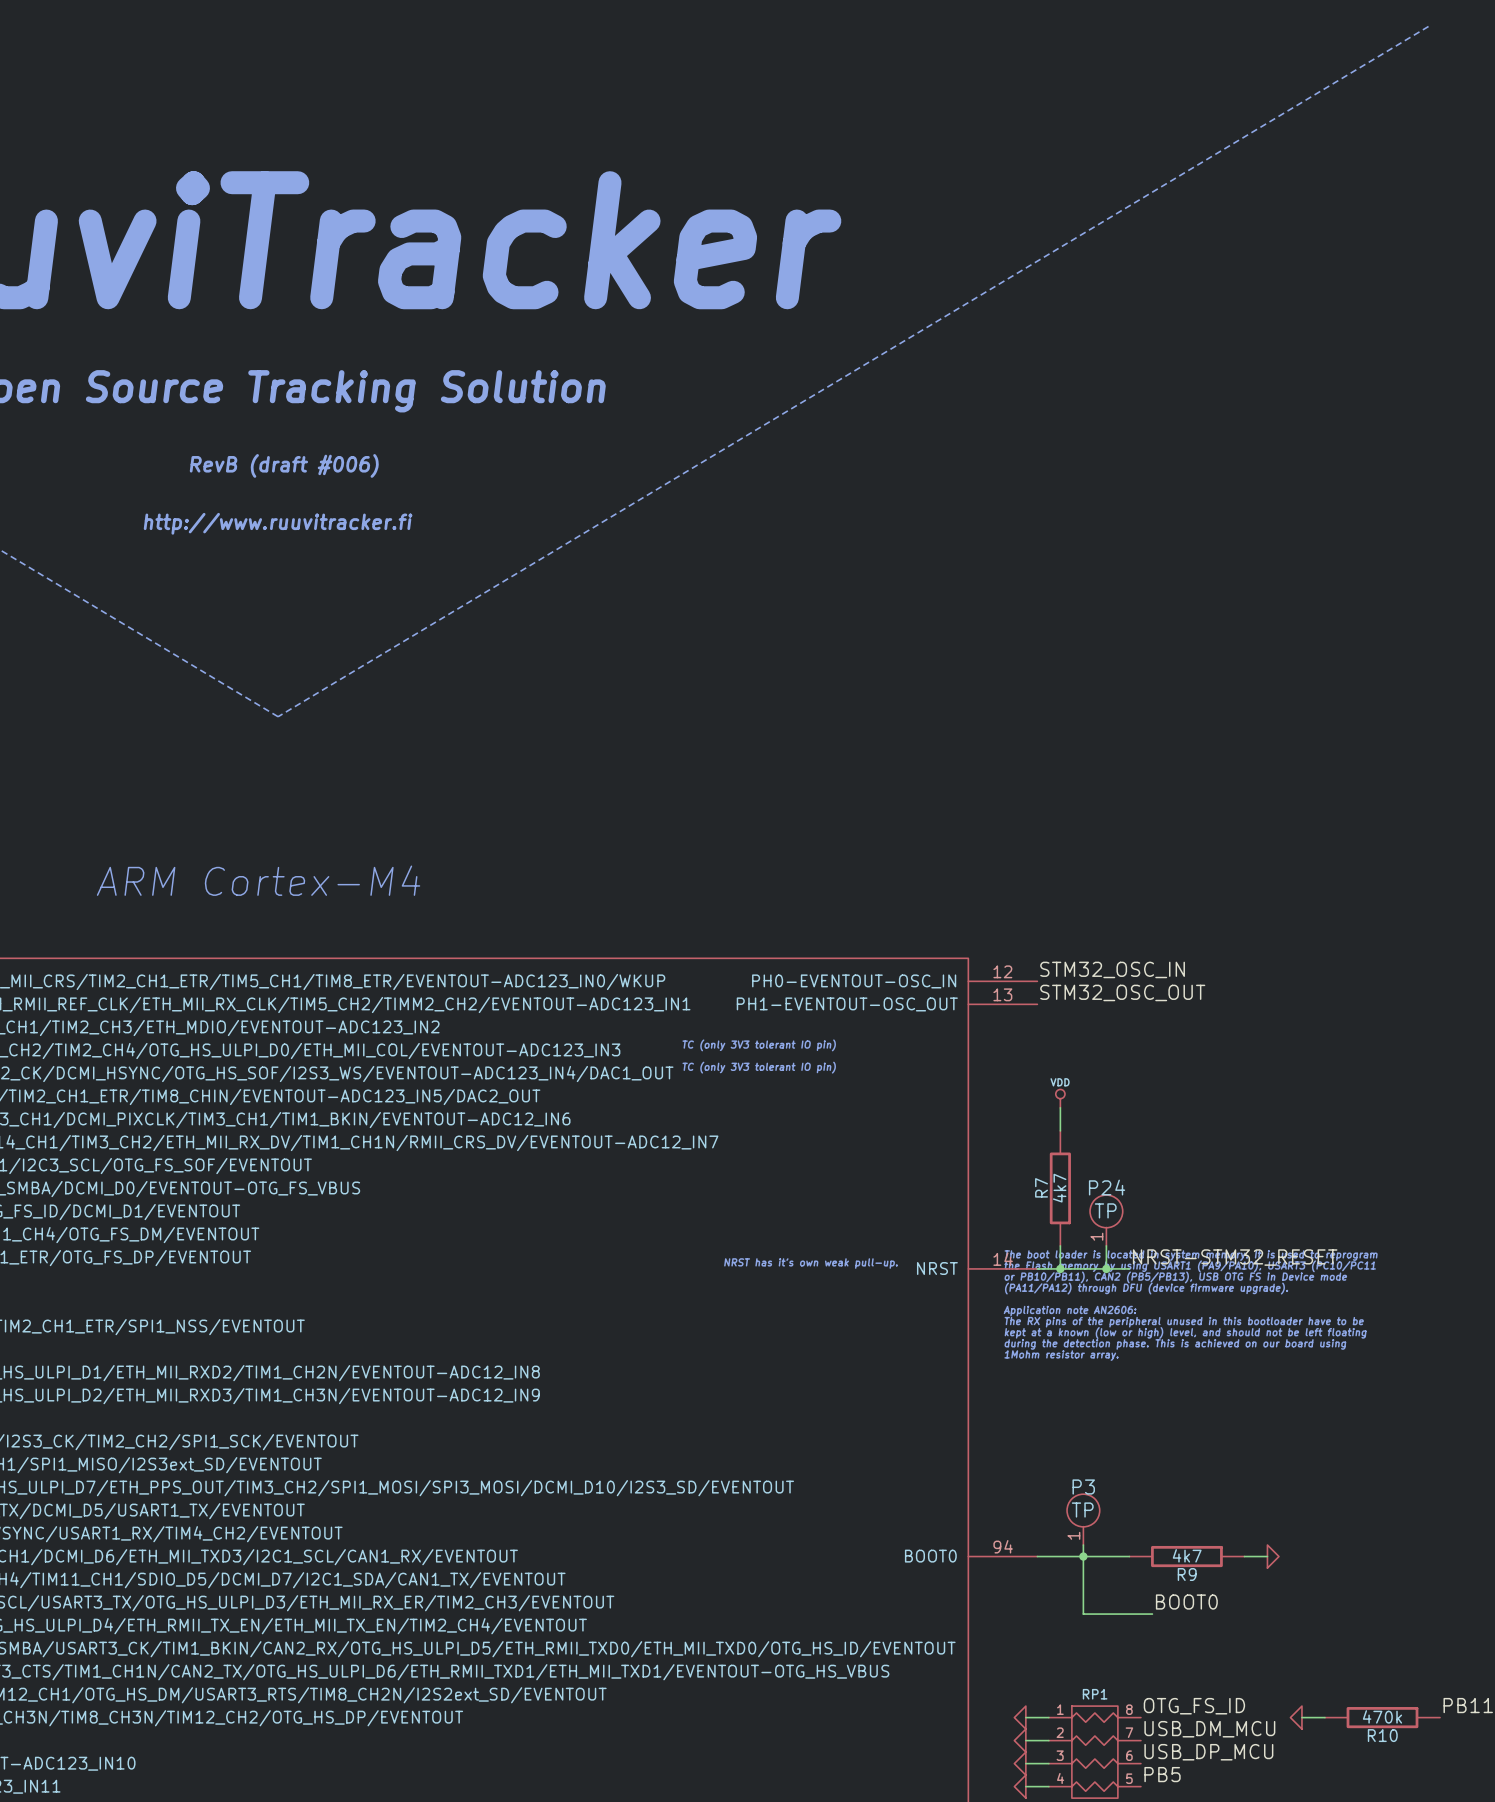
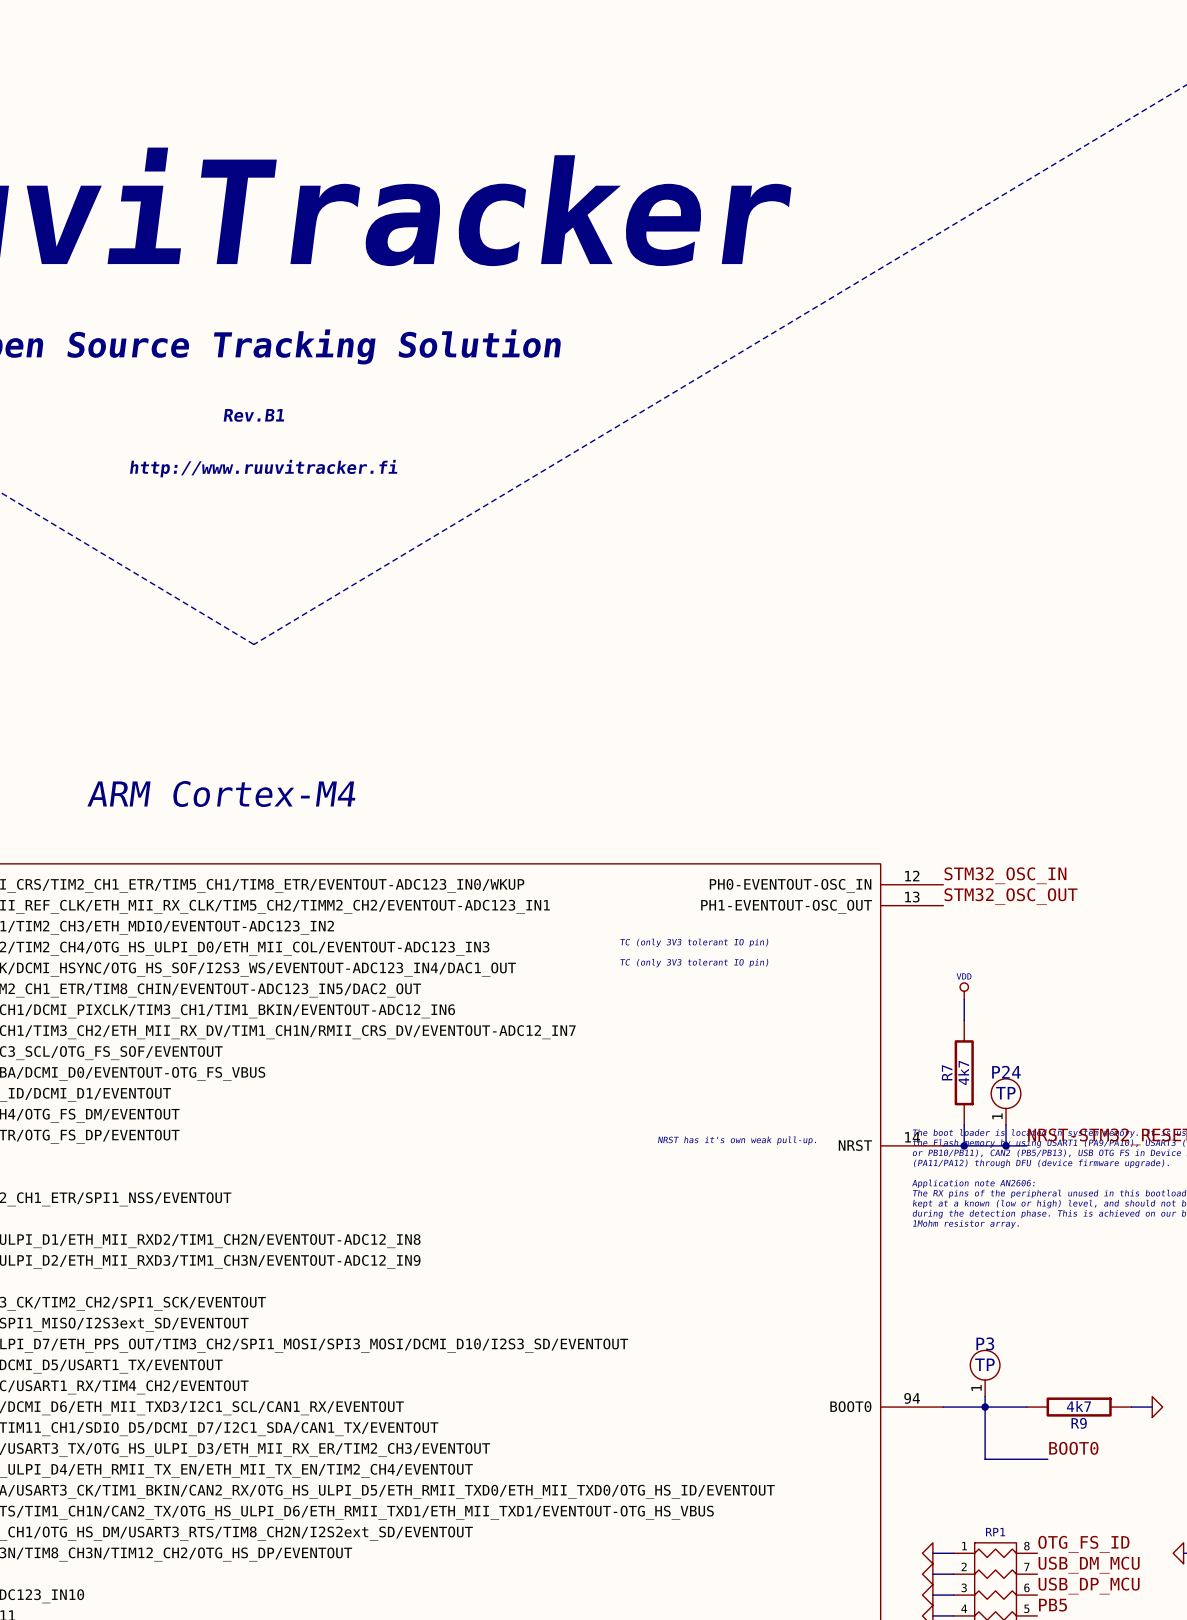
text: none -> Rev.B1 (253, 415)
text: RevB (draft #006) (284, 465) -> none

